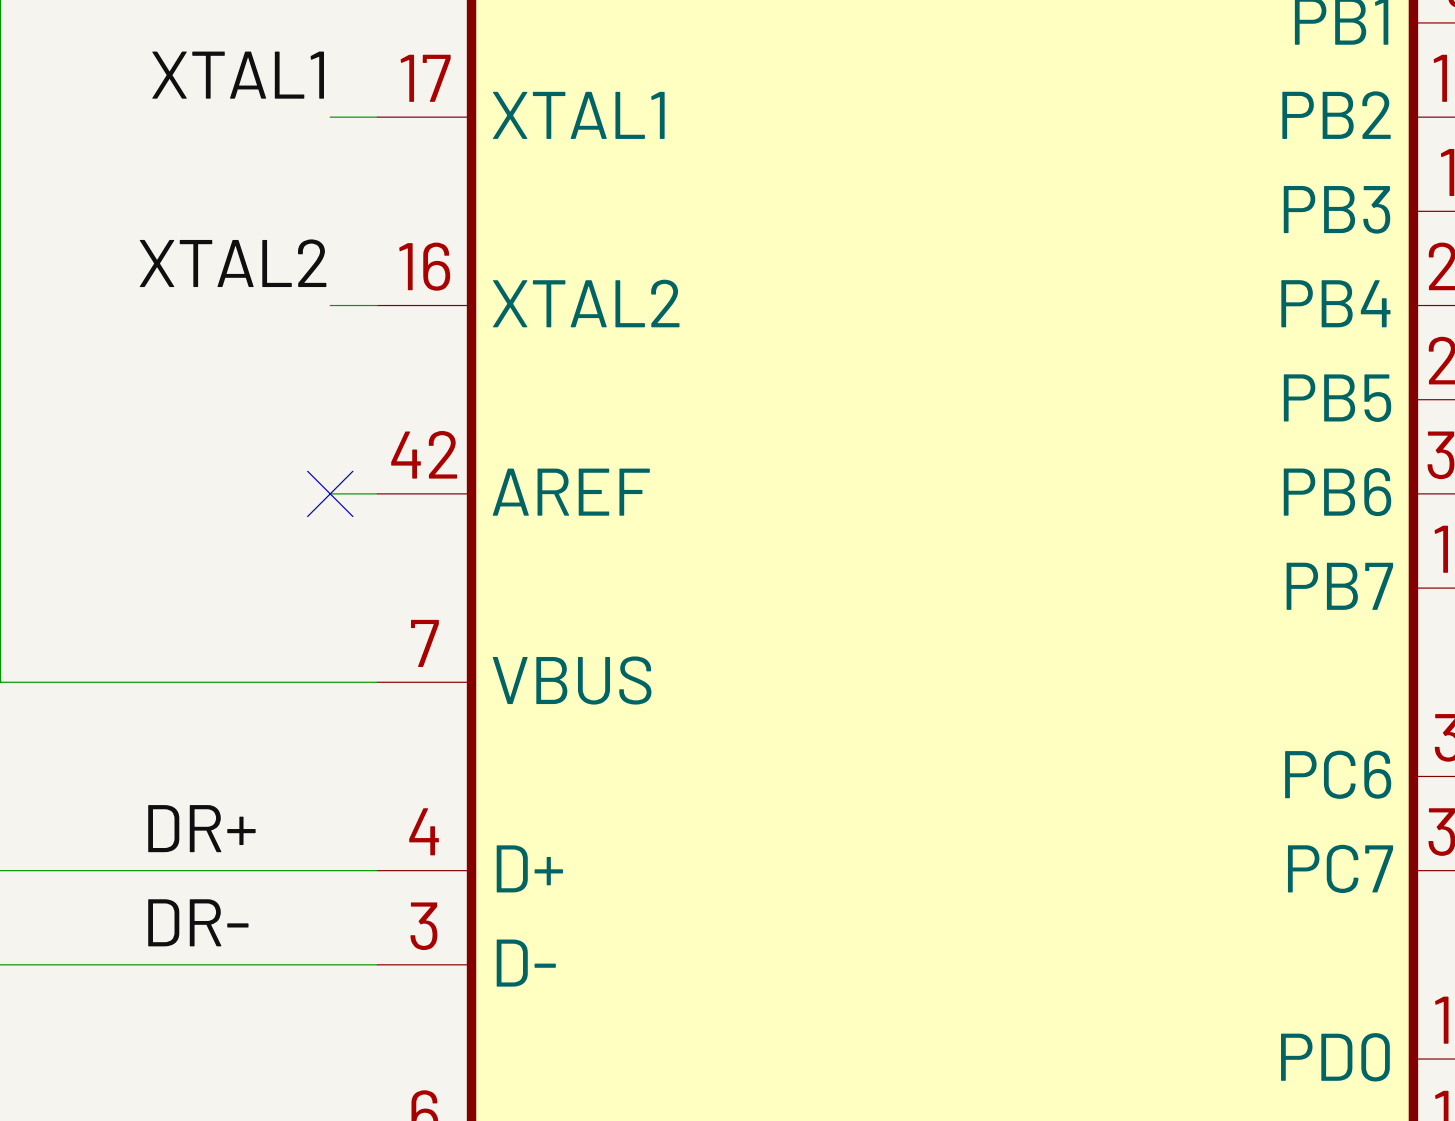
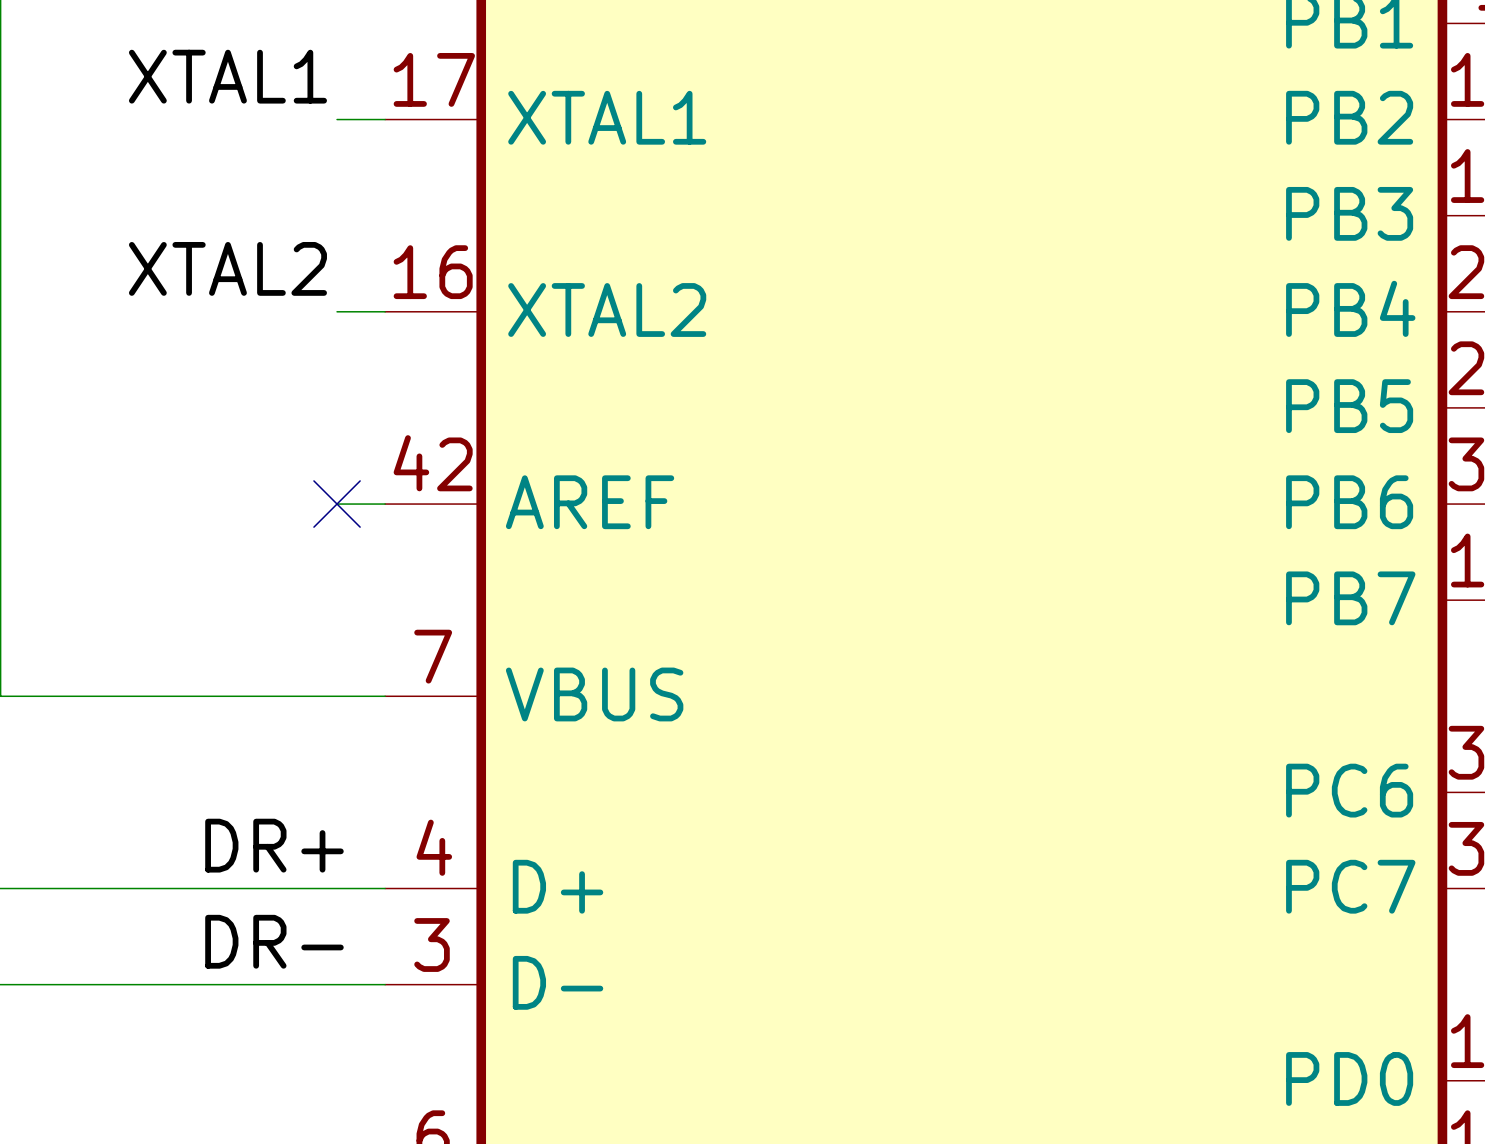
label position: DR+ (201, 828) -> DR+ (274, 845)
label position: DR- (198, 922) -> DR- (274, 941)

